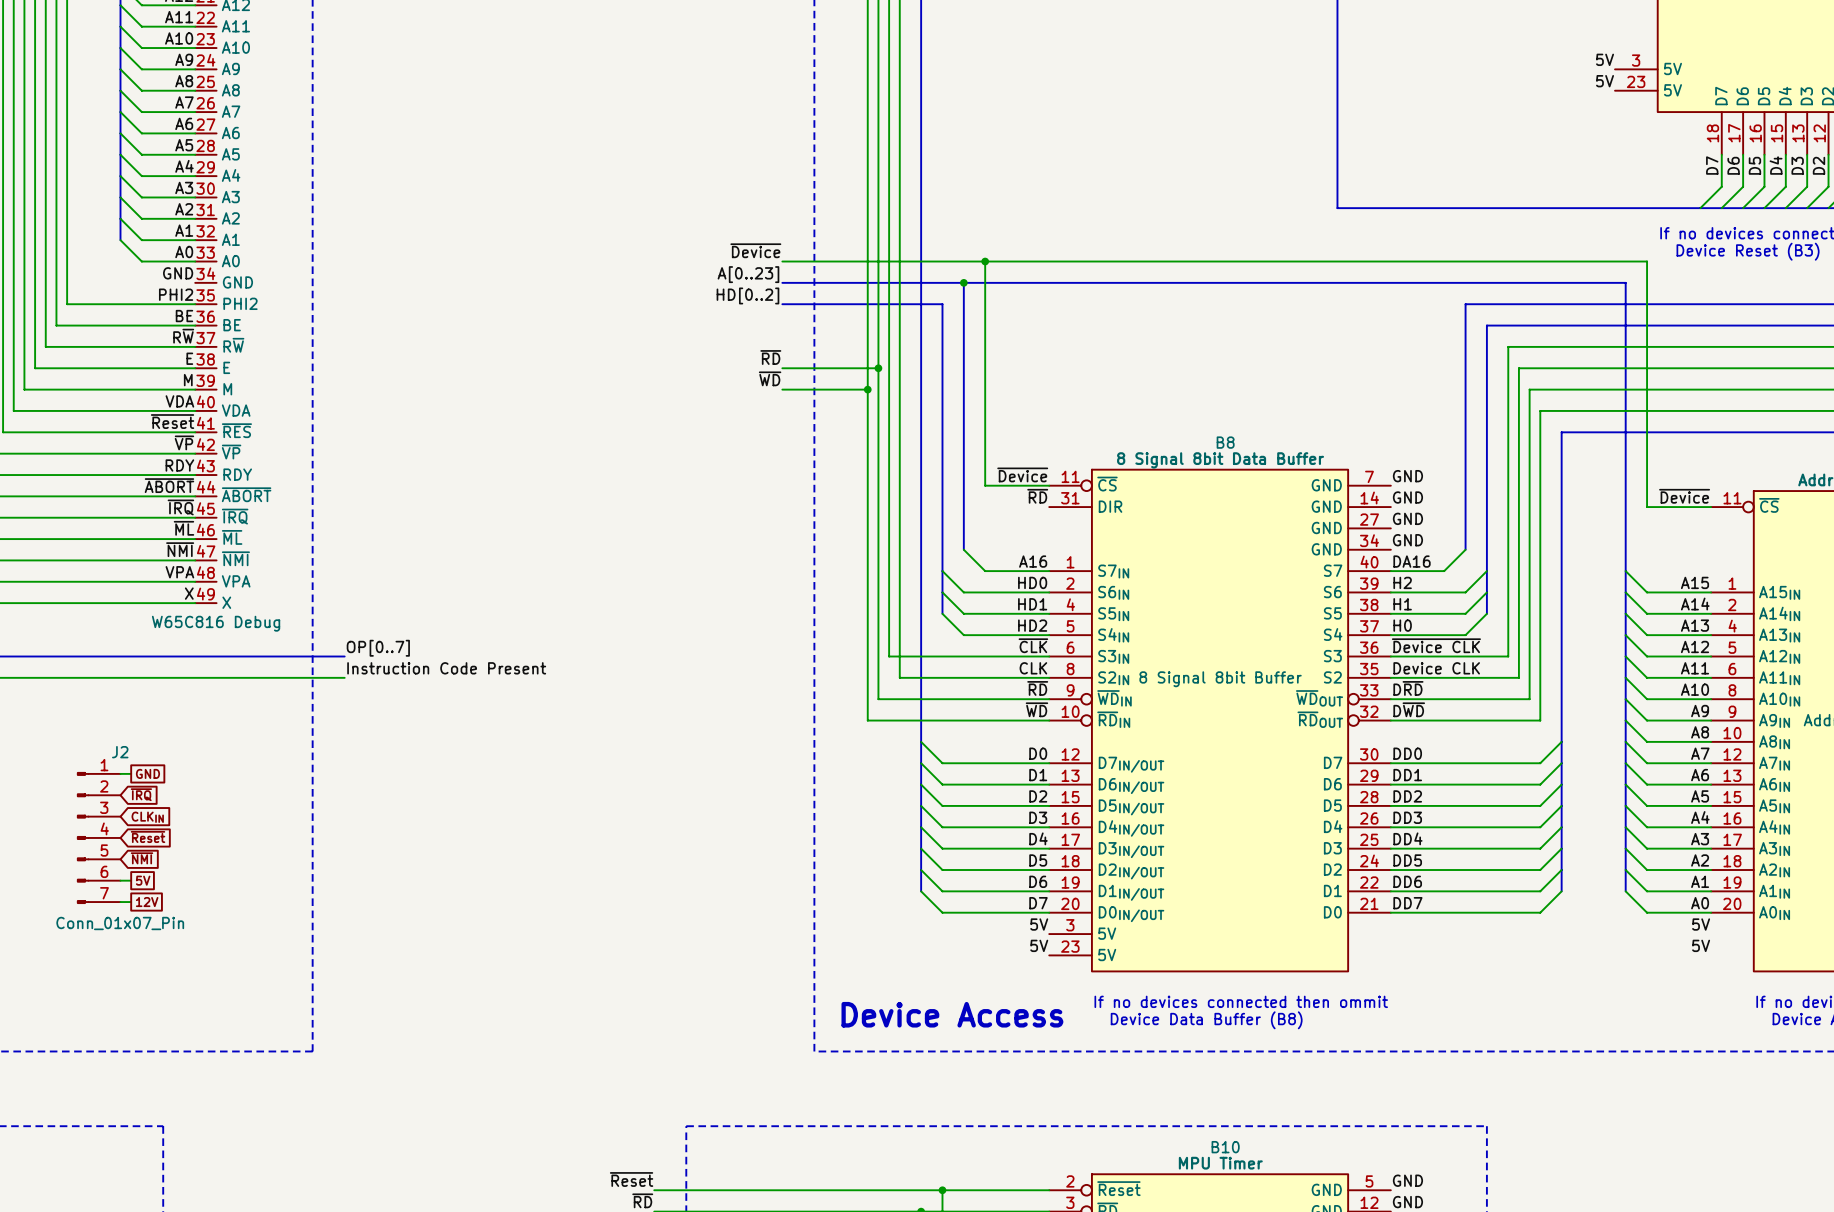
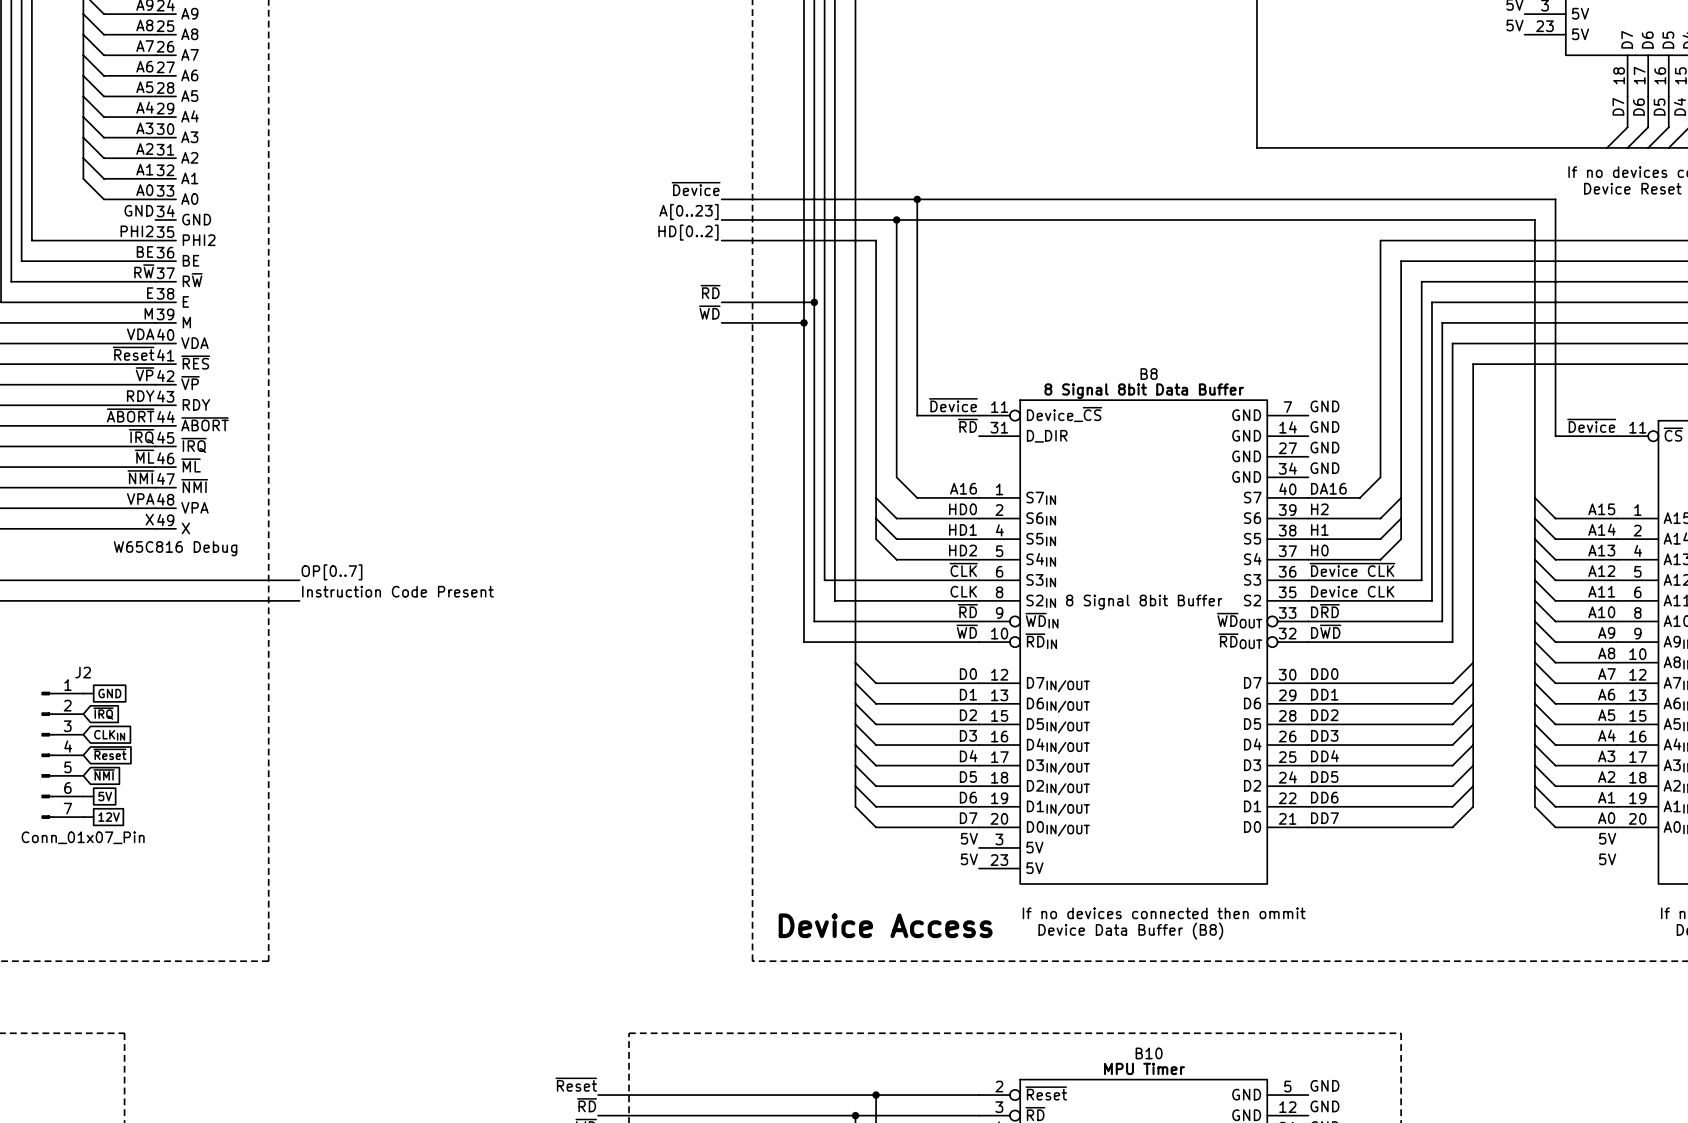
B8 pin name: ~{CS} (1107, 484) -> Device_~{CS} (1064, 414)
B8 pin name: DIR (1110, 506) -> D_DIR (1047, 436)

